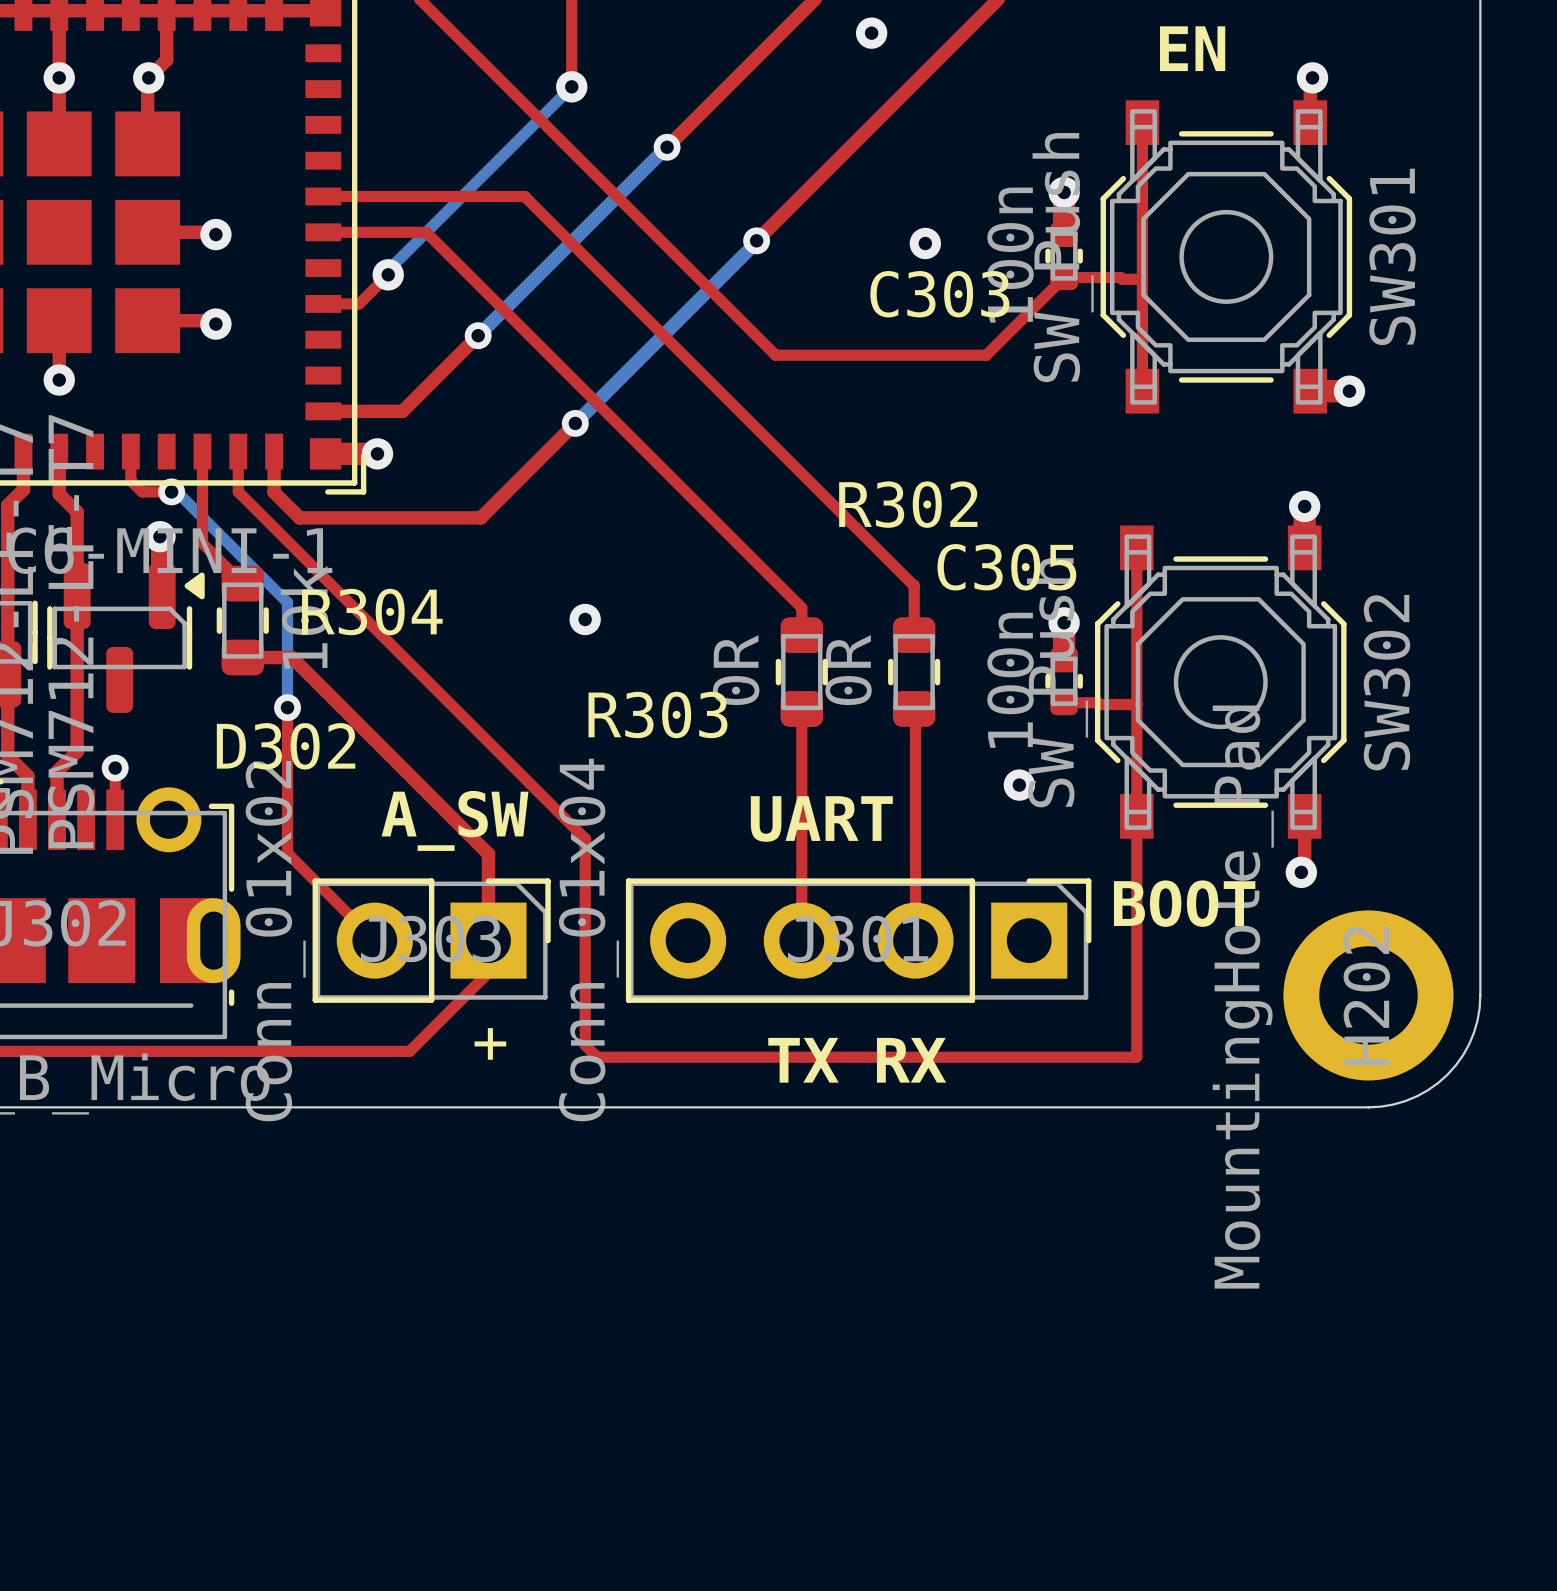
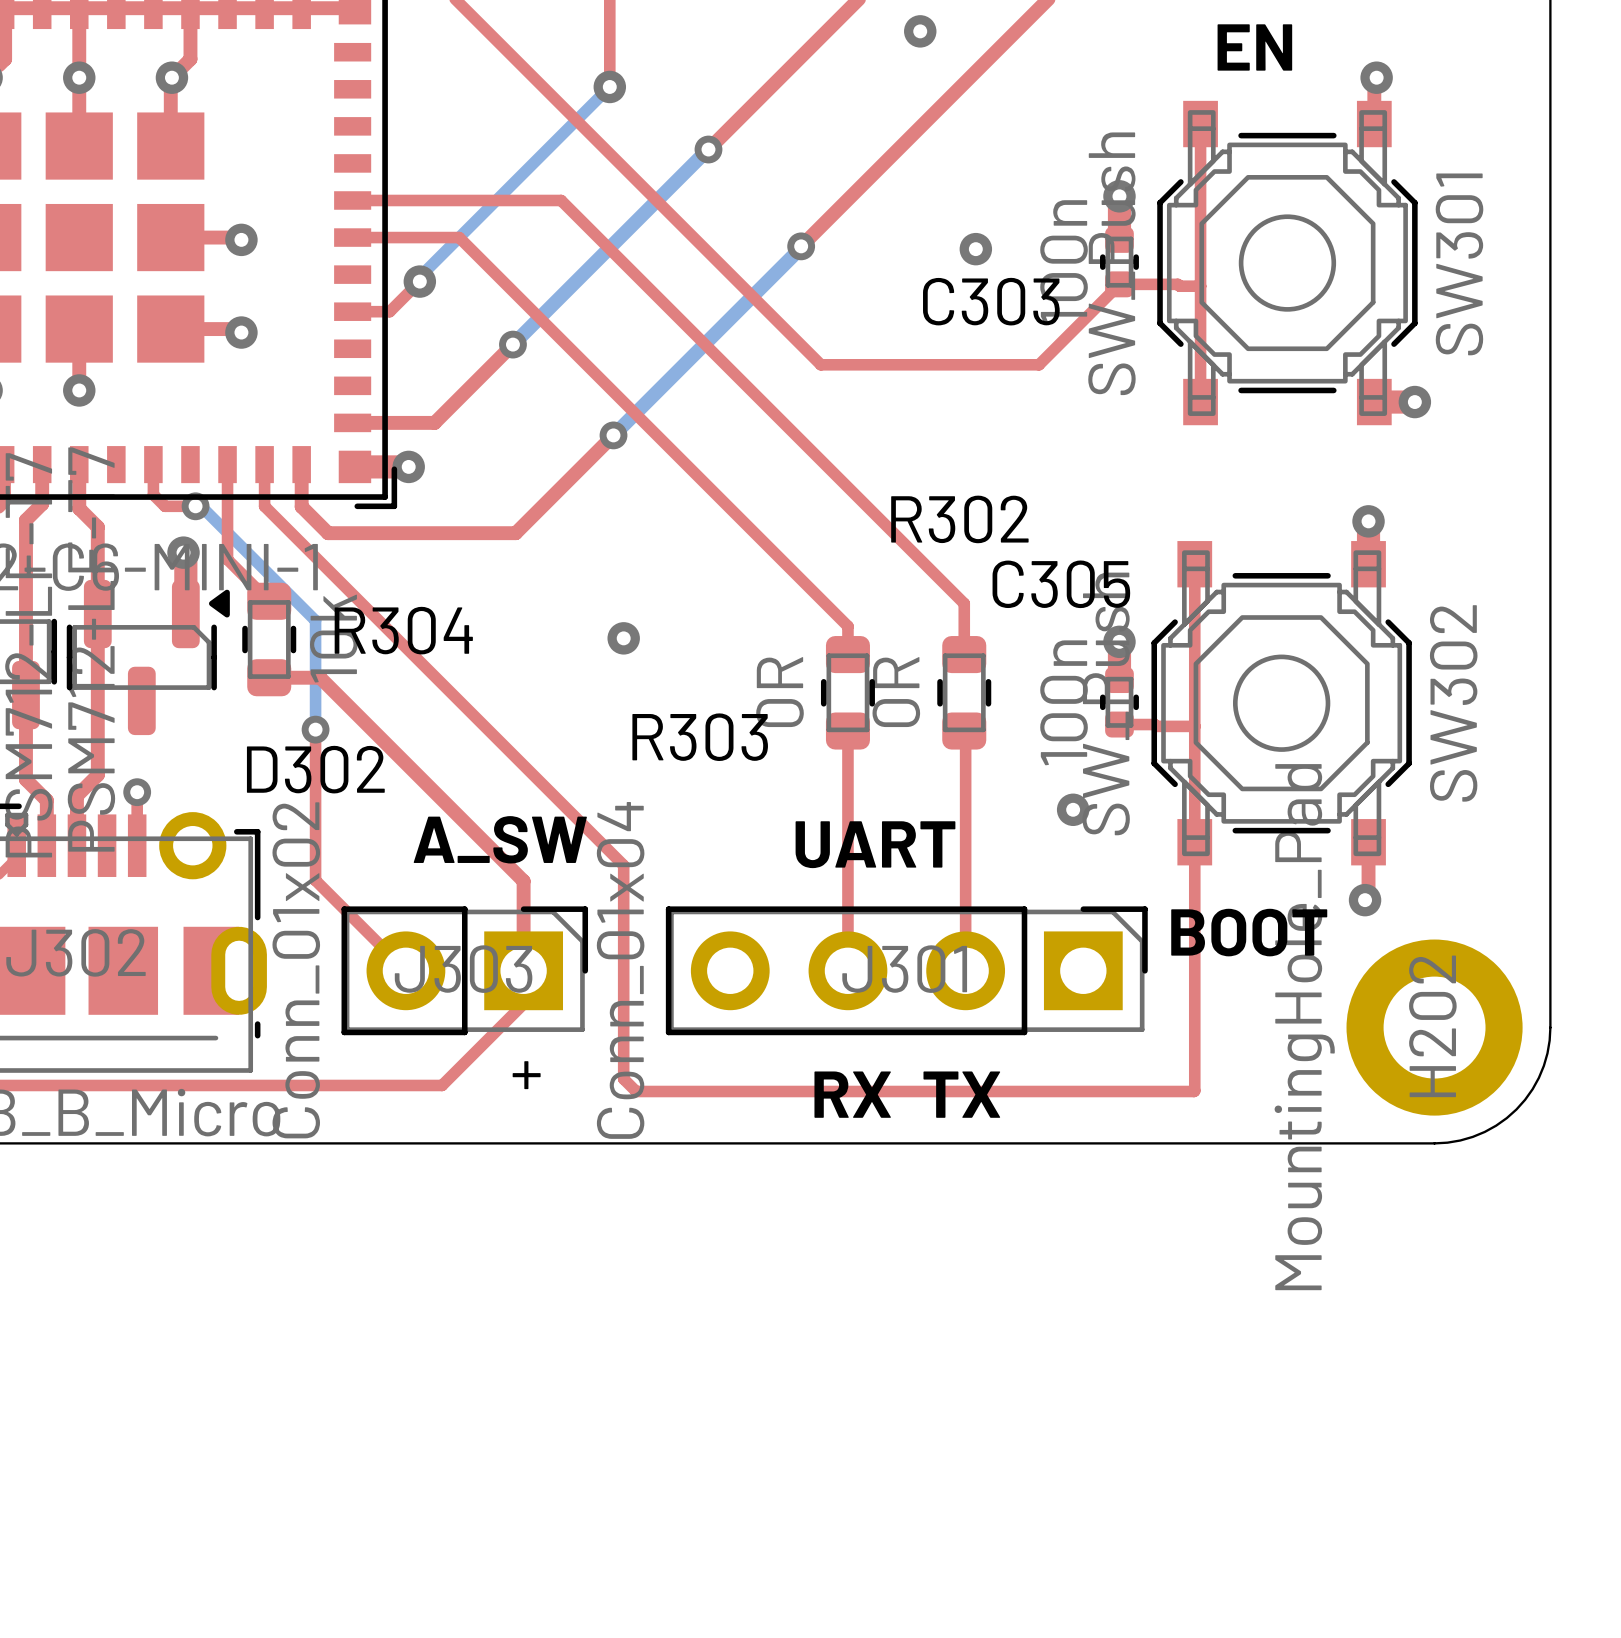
text: TX (803, 1060) -> RX (852, 1094)
text: RX (911, 1060) -> TX (961, 1094)

